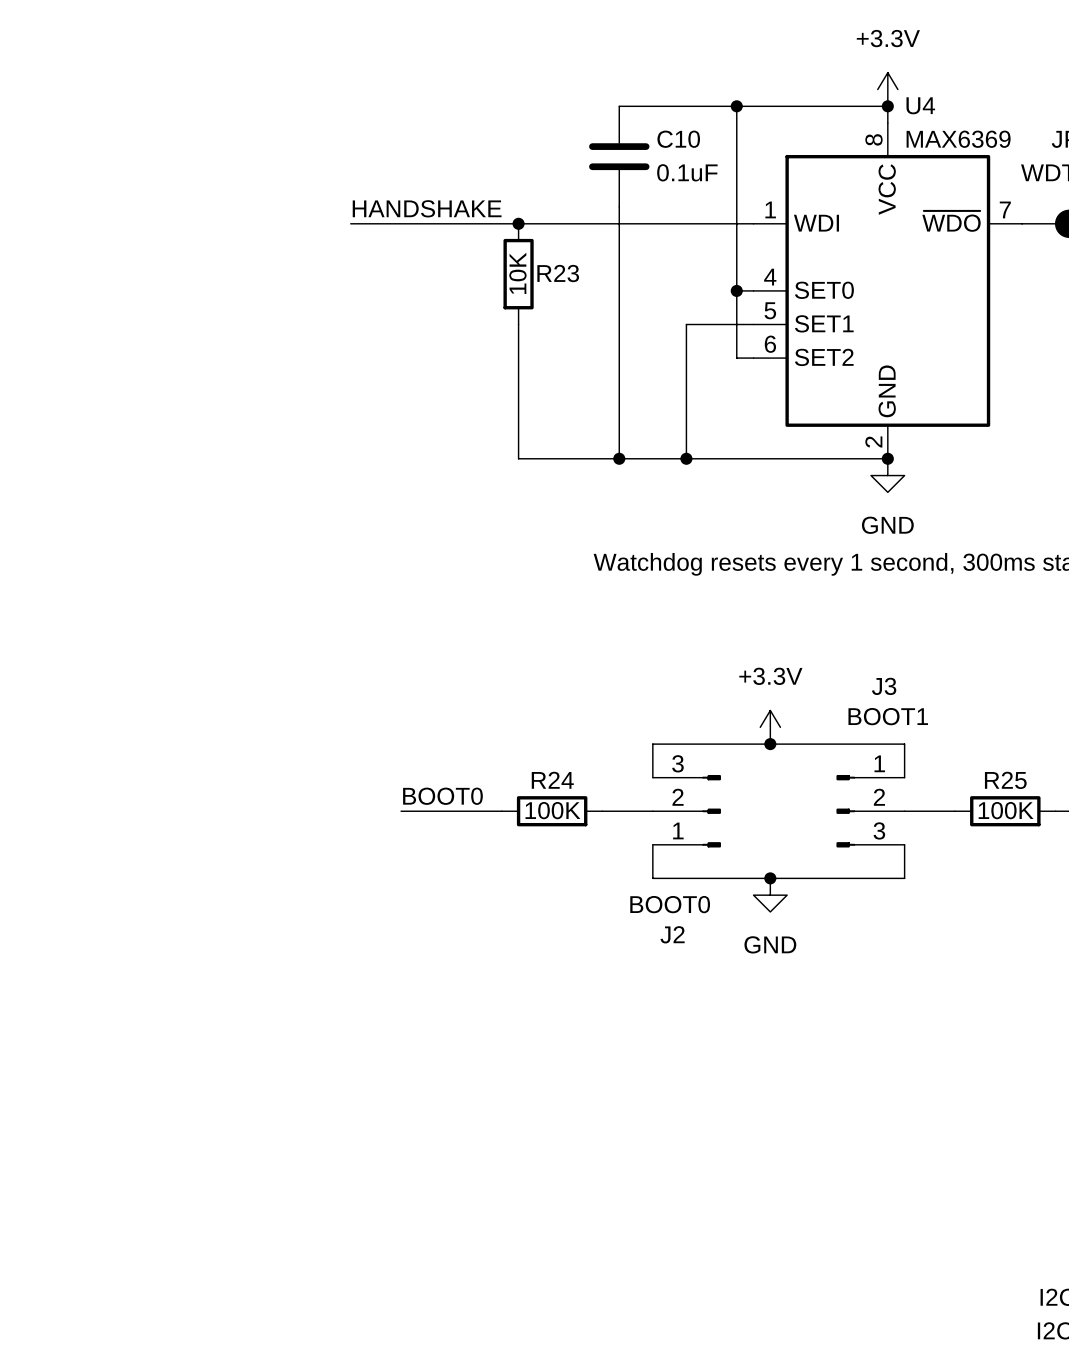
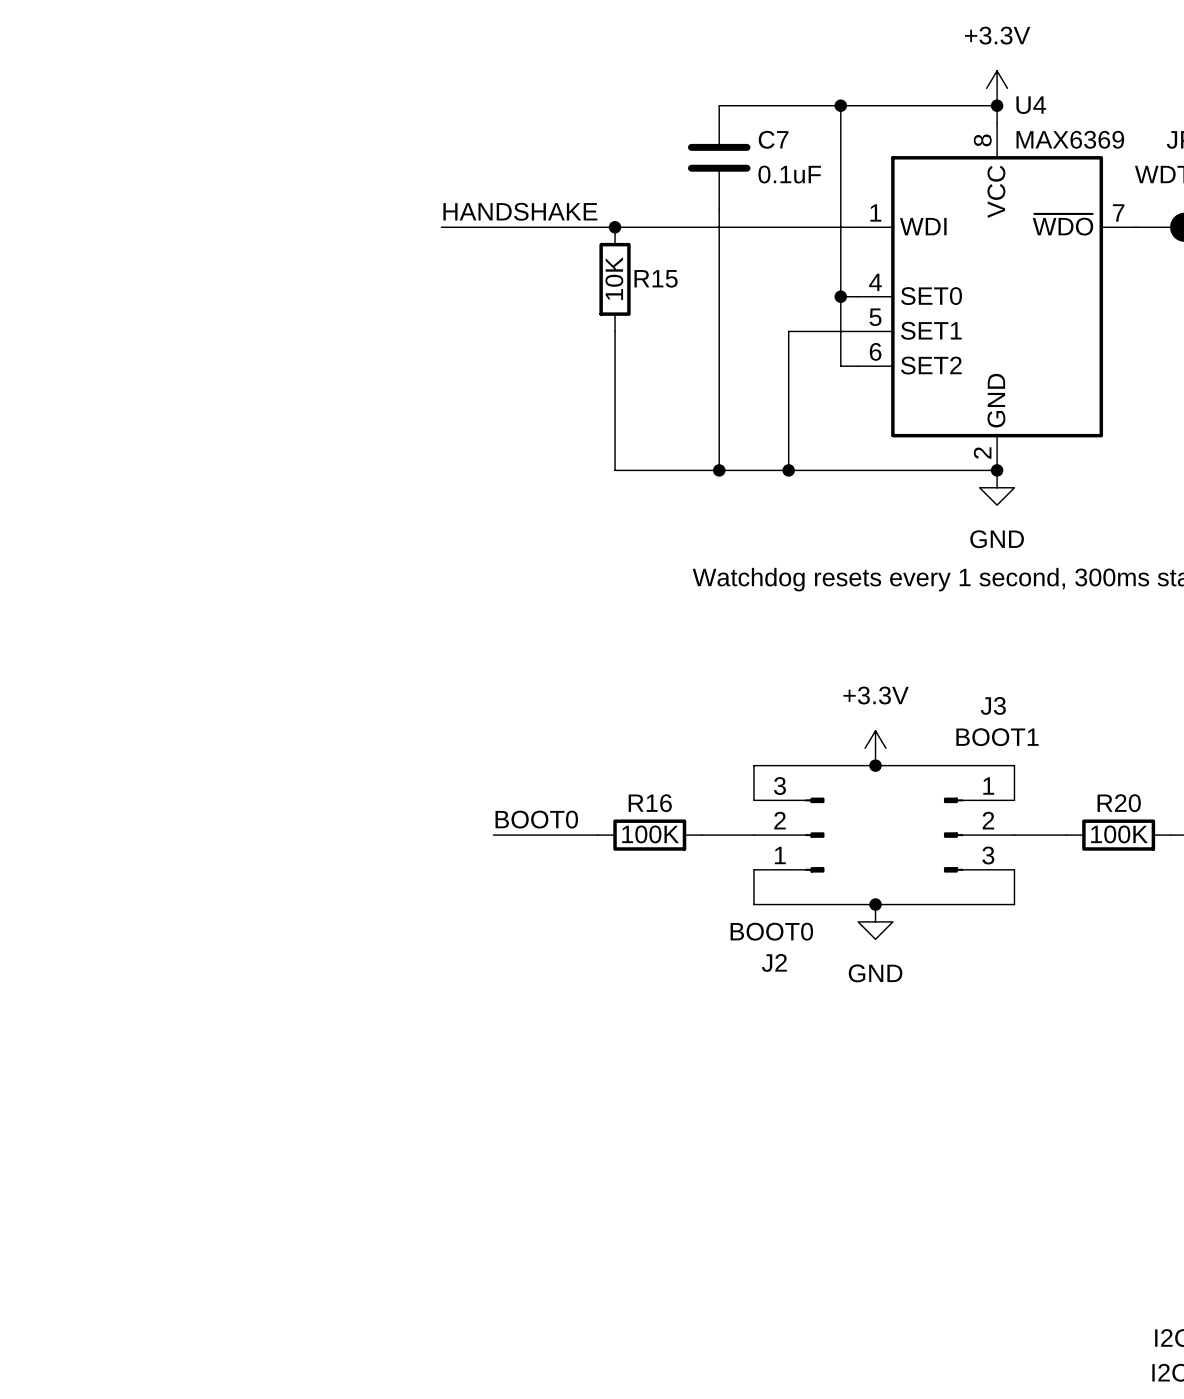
C10 name: C10 (678, 139) -> C7 (773, 139)
R23 name: R23 (558, 273) -> R15 (656, 278)
R24 name: R24 (552, 780) -> R16 (650, 803)
R25 name: R25 (1005, 780) -> R20 (1119, 803)

